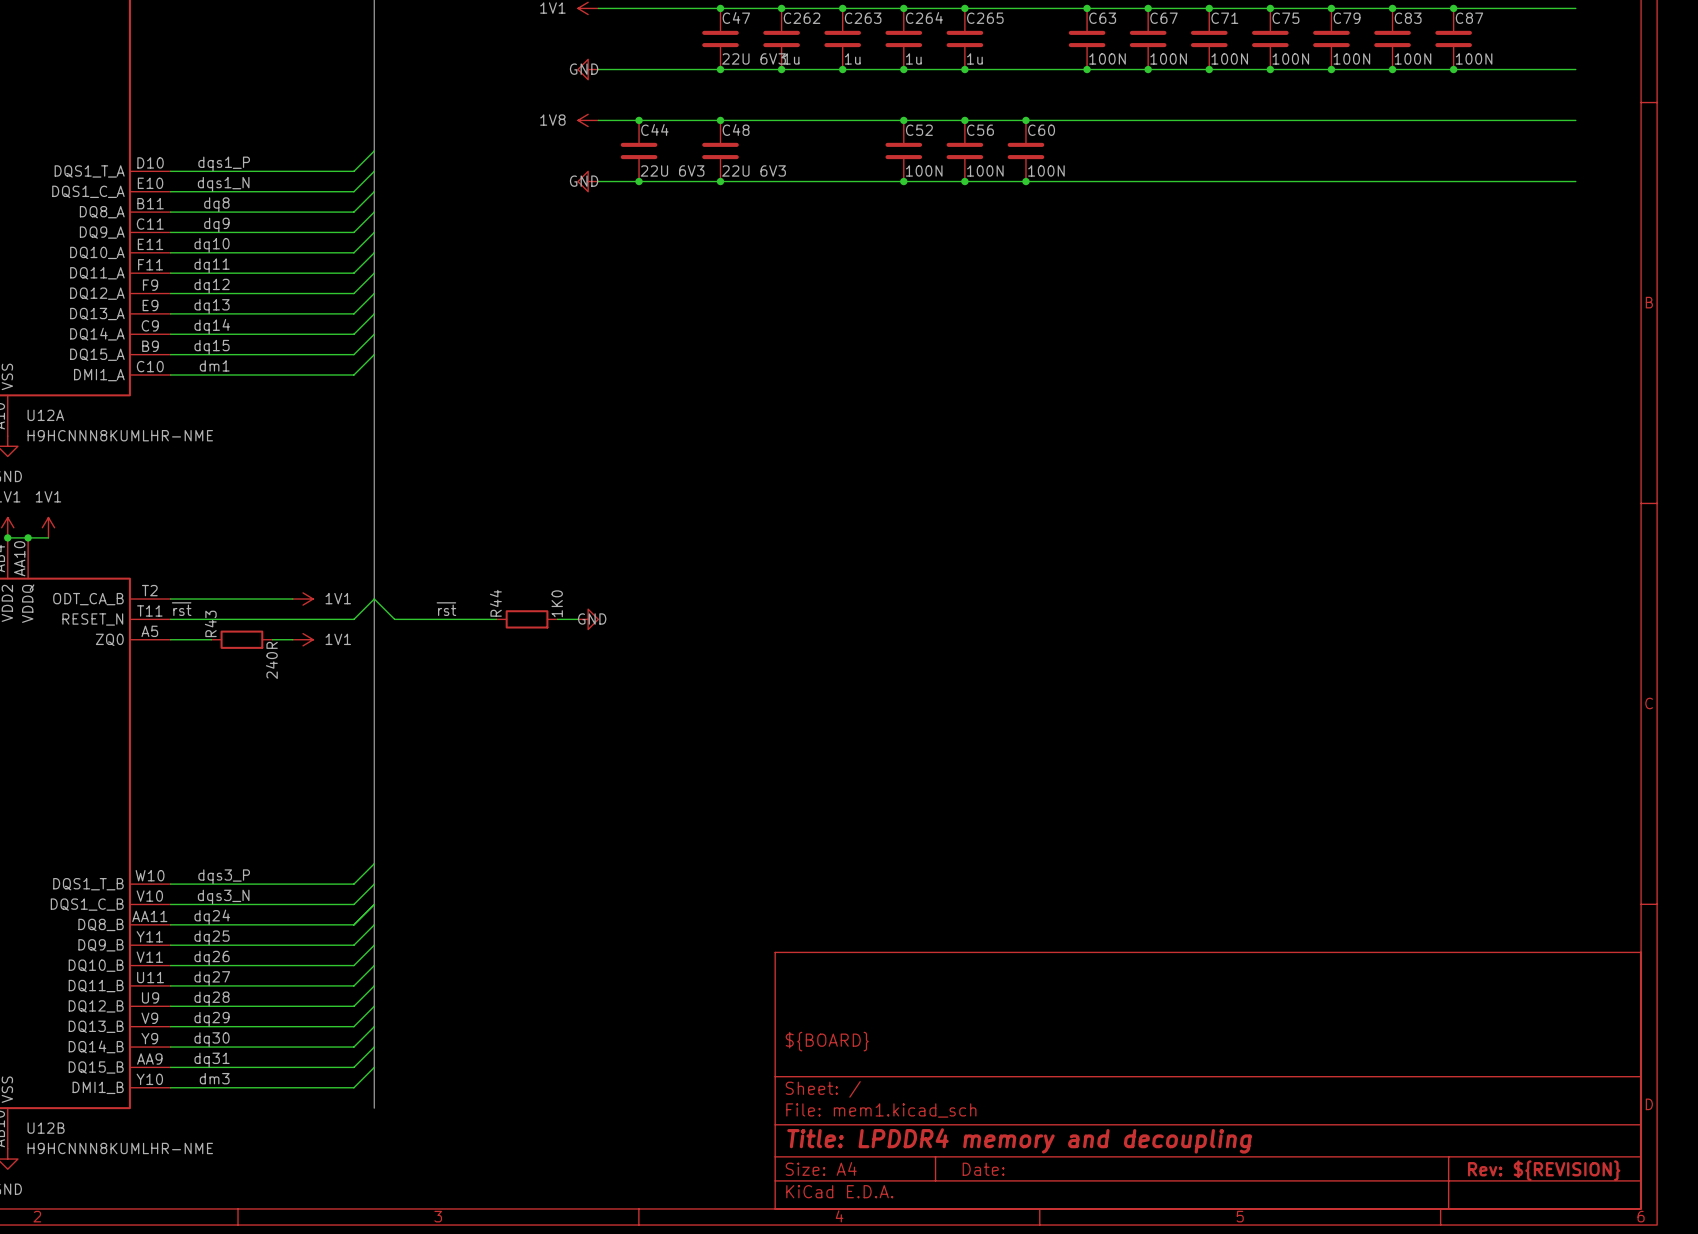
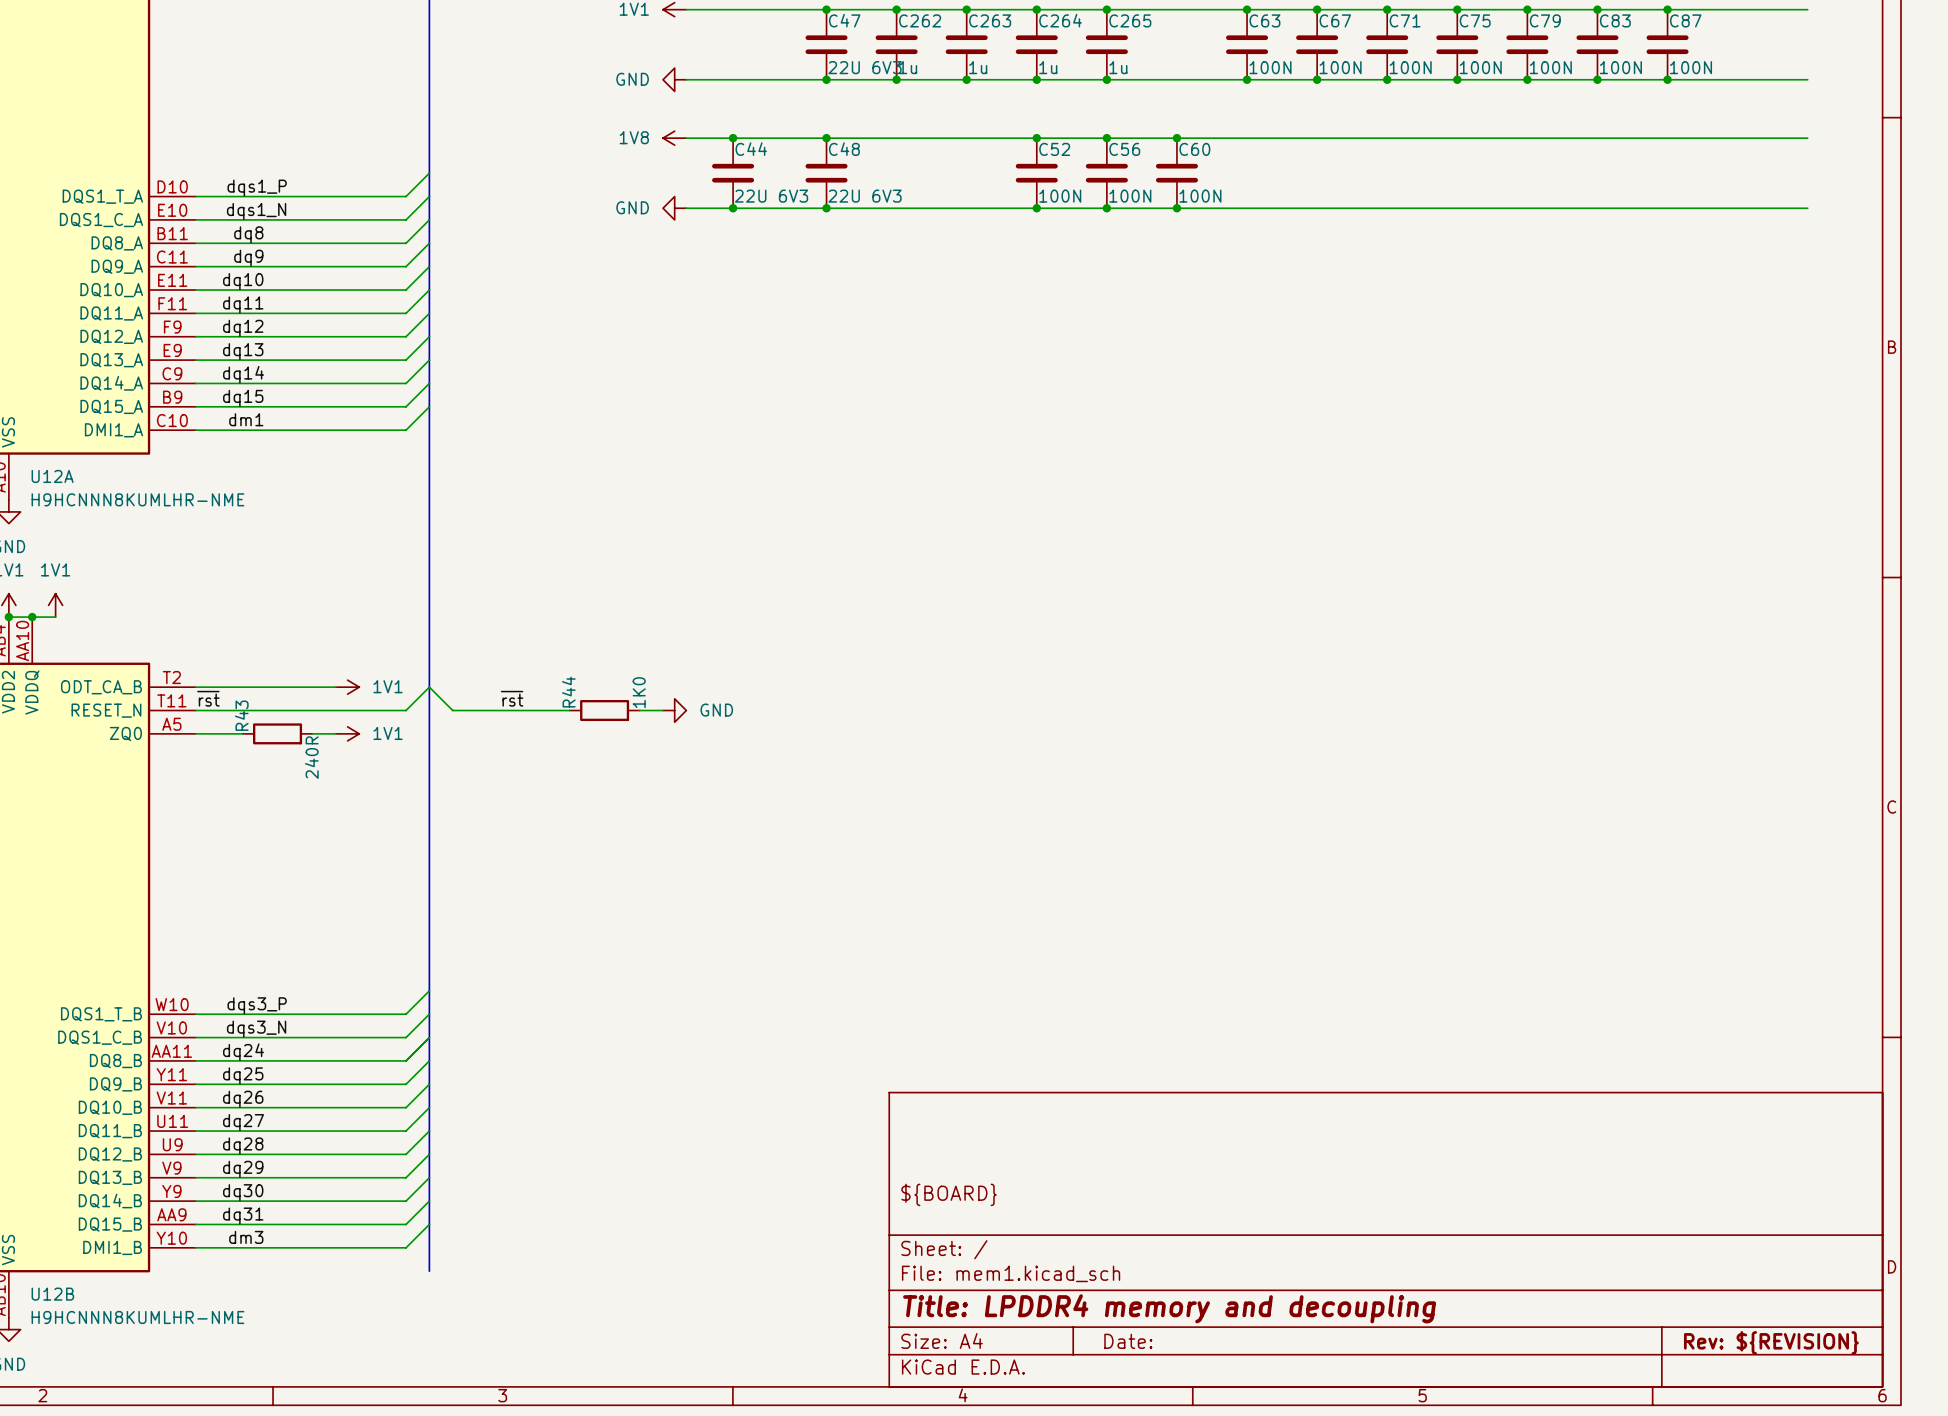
power symbol text position: GND (584, 69) -> GND (632, 79)
power symbol text position: GND (584, 181) -> GND (632, 207)
power symbol text position: GND (592, 618) -> GND (716, 710)

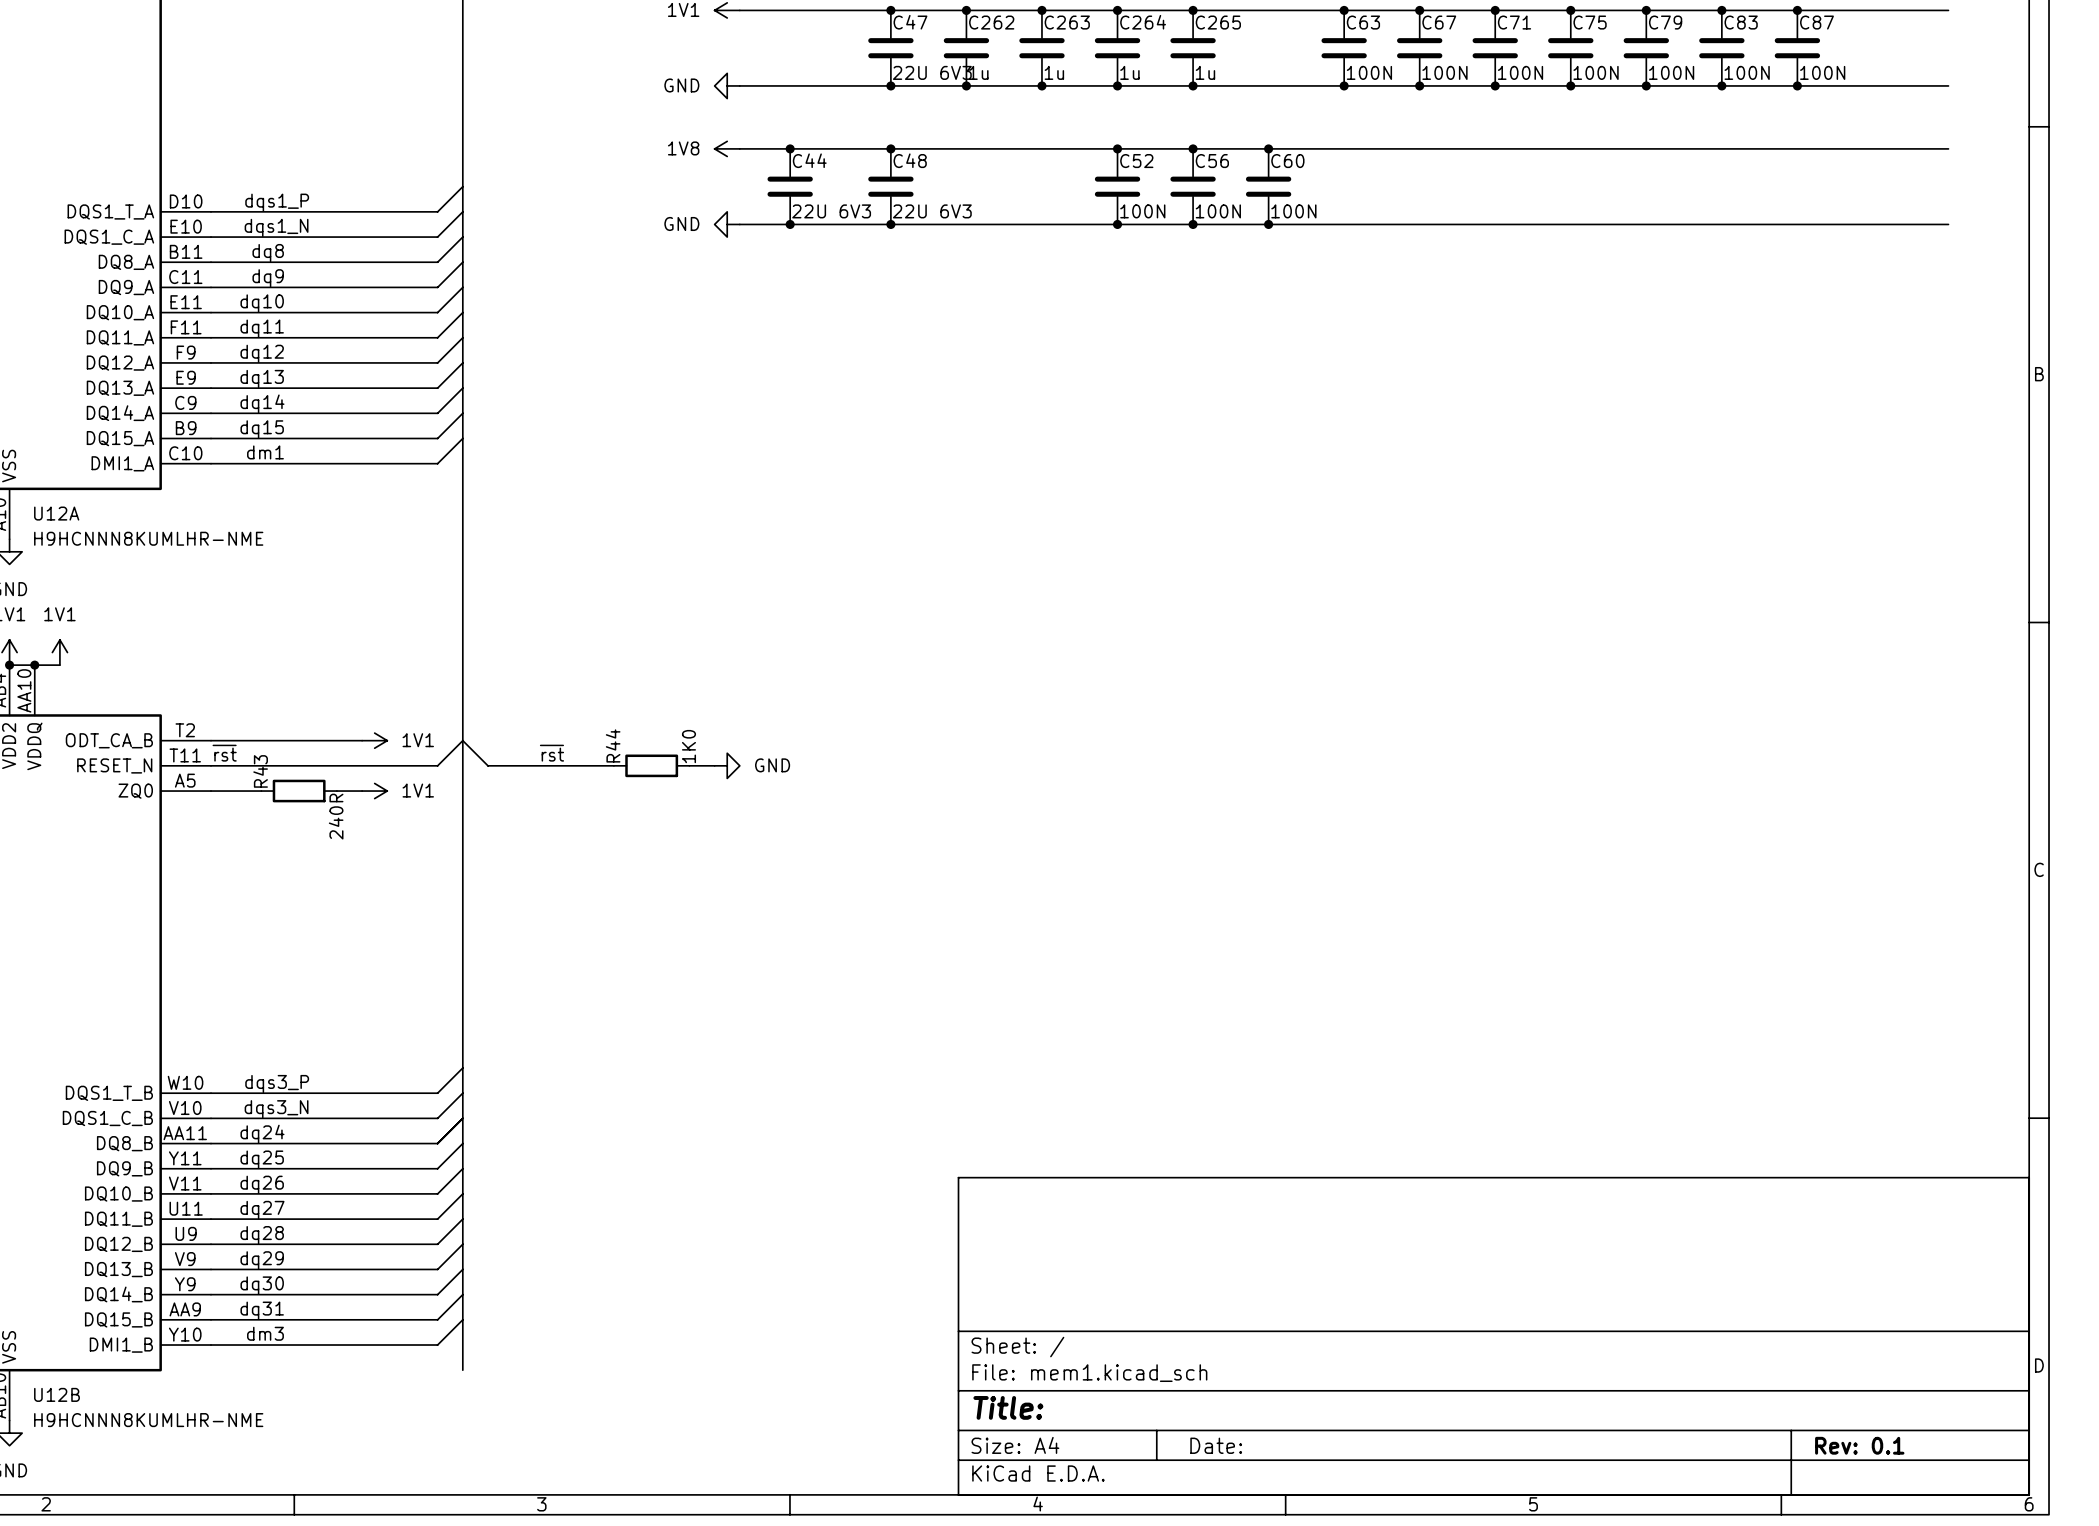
title block: ${BOARD} (948, 1194) -> none
title block: Title: LPDDR4 memory and decoupling (1169, 1308) -> Title: (1008, 1407)
title block: Rev: ${REVISION} (1771, 1342) -> Rev: 0.1 (1859, 1445)

